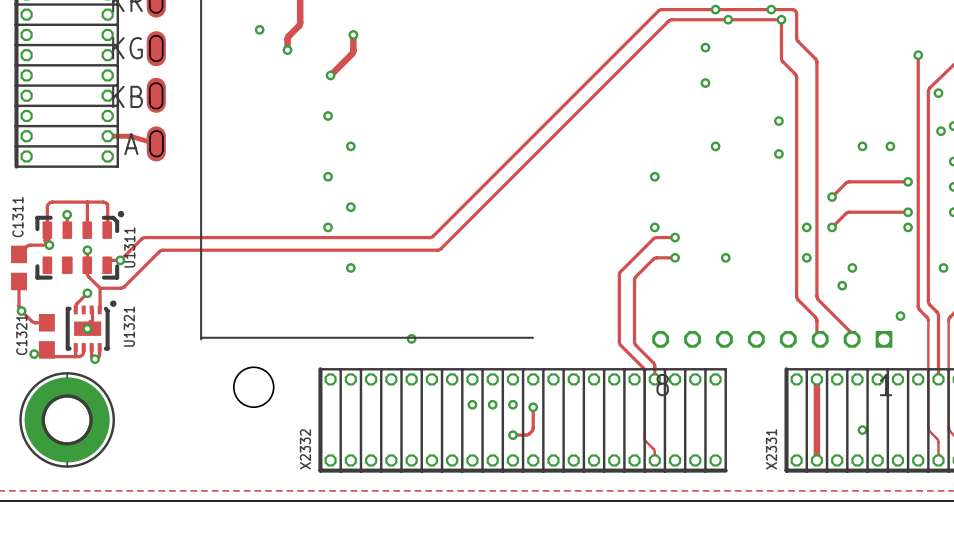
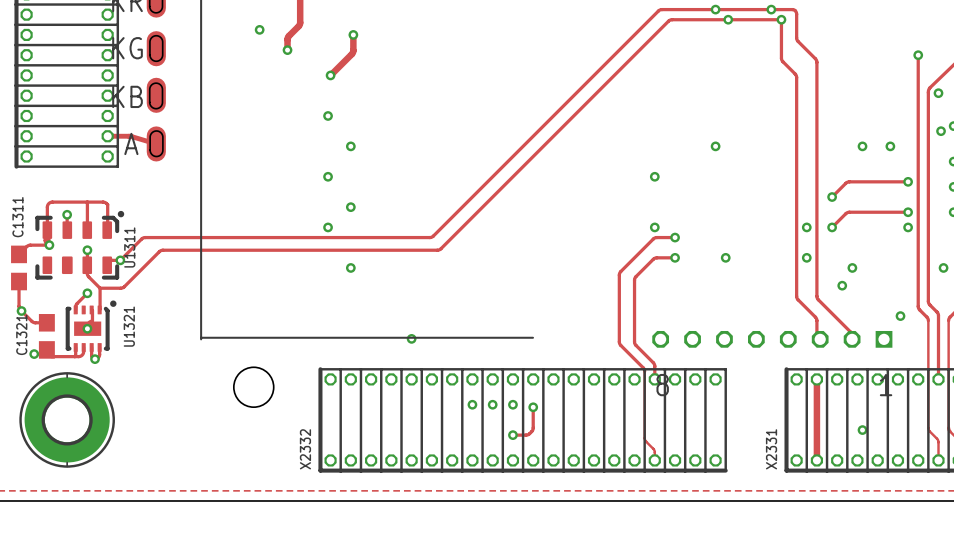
via: (705, 47) -> none
via: (705, 83) -> none
via: (778, 121) -> none
via: (778, 153) -> none

